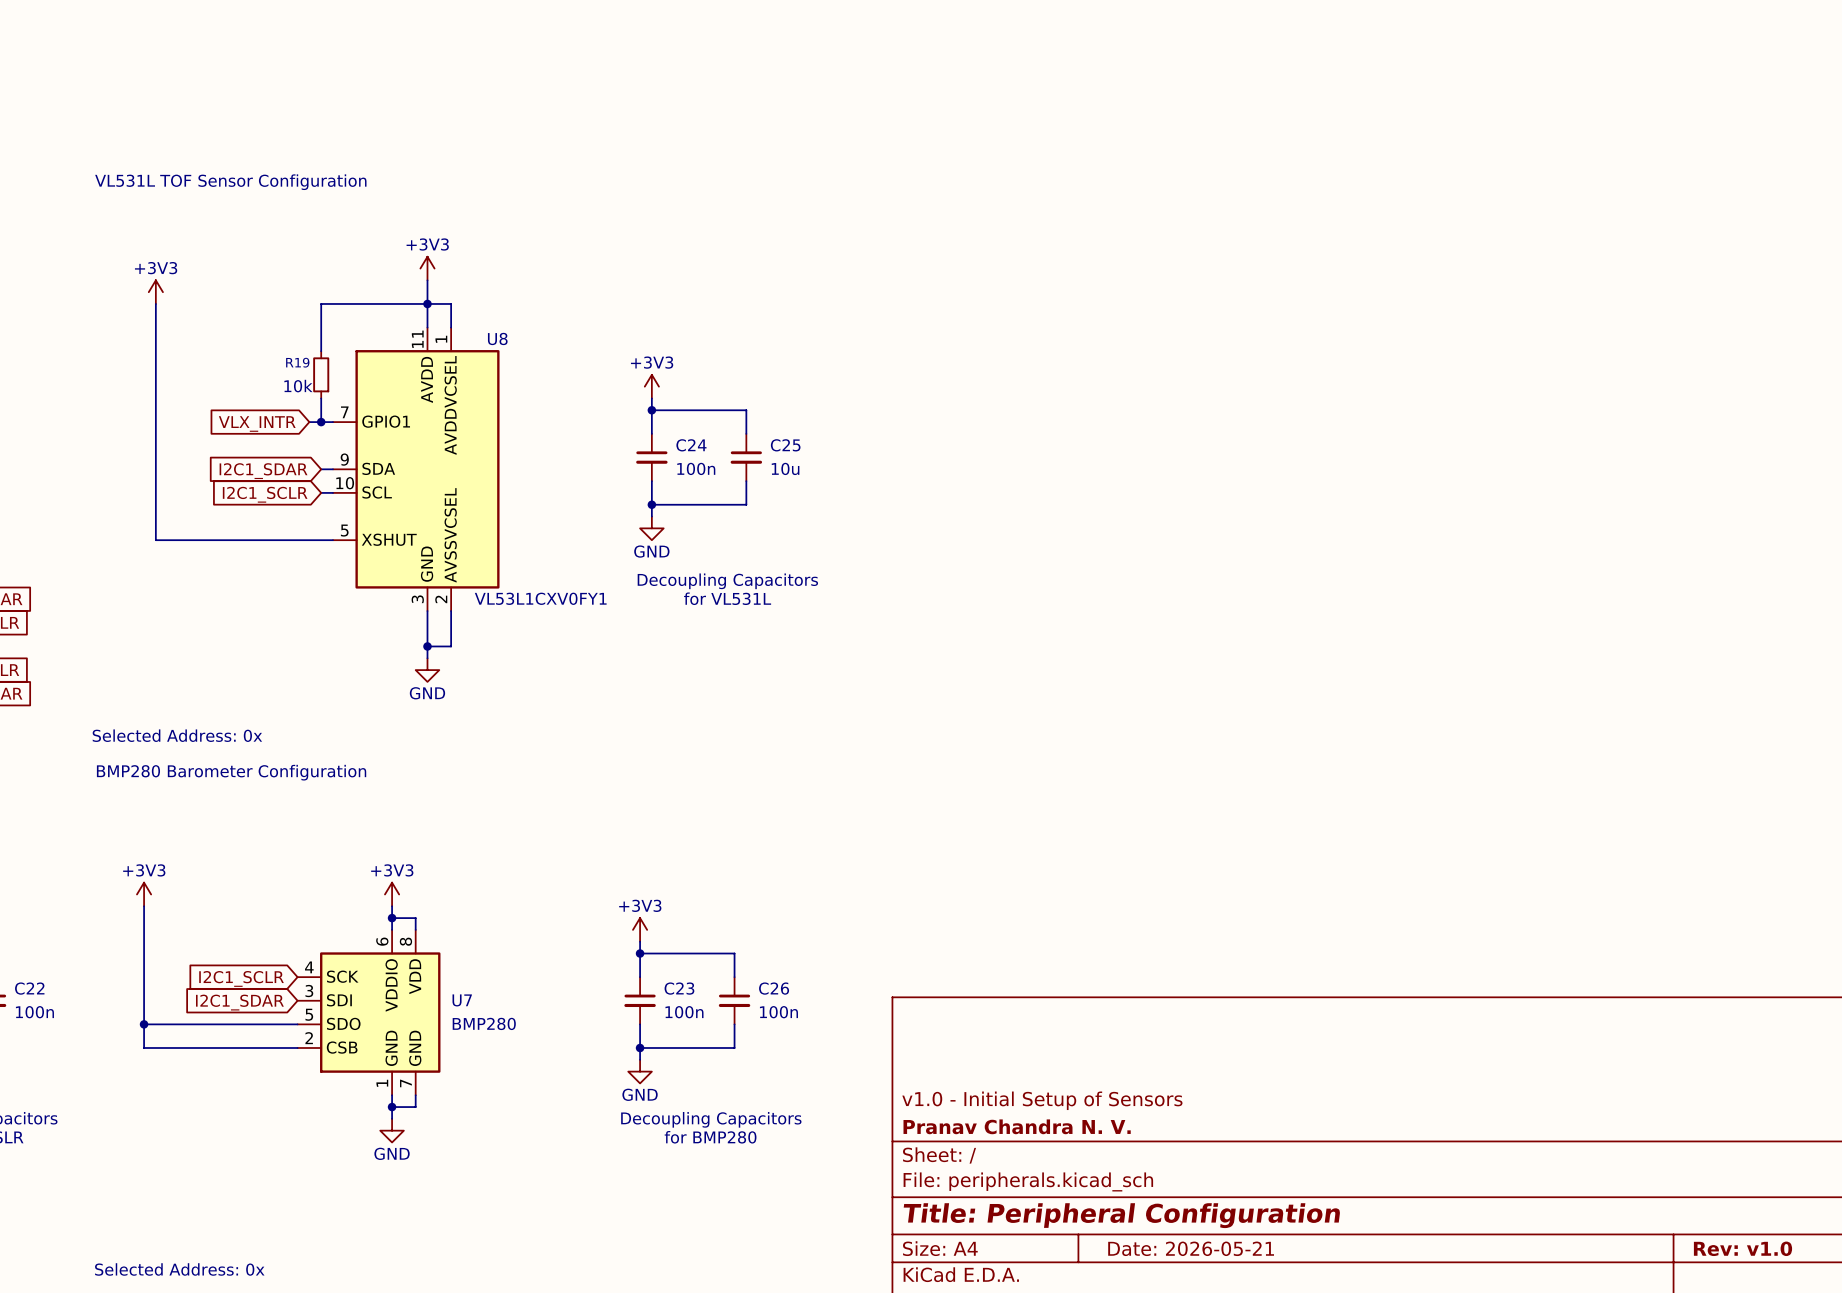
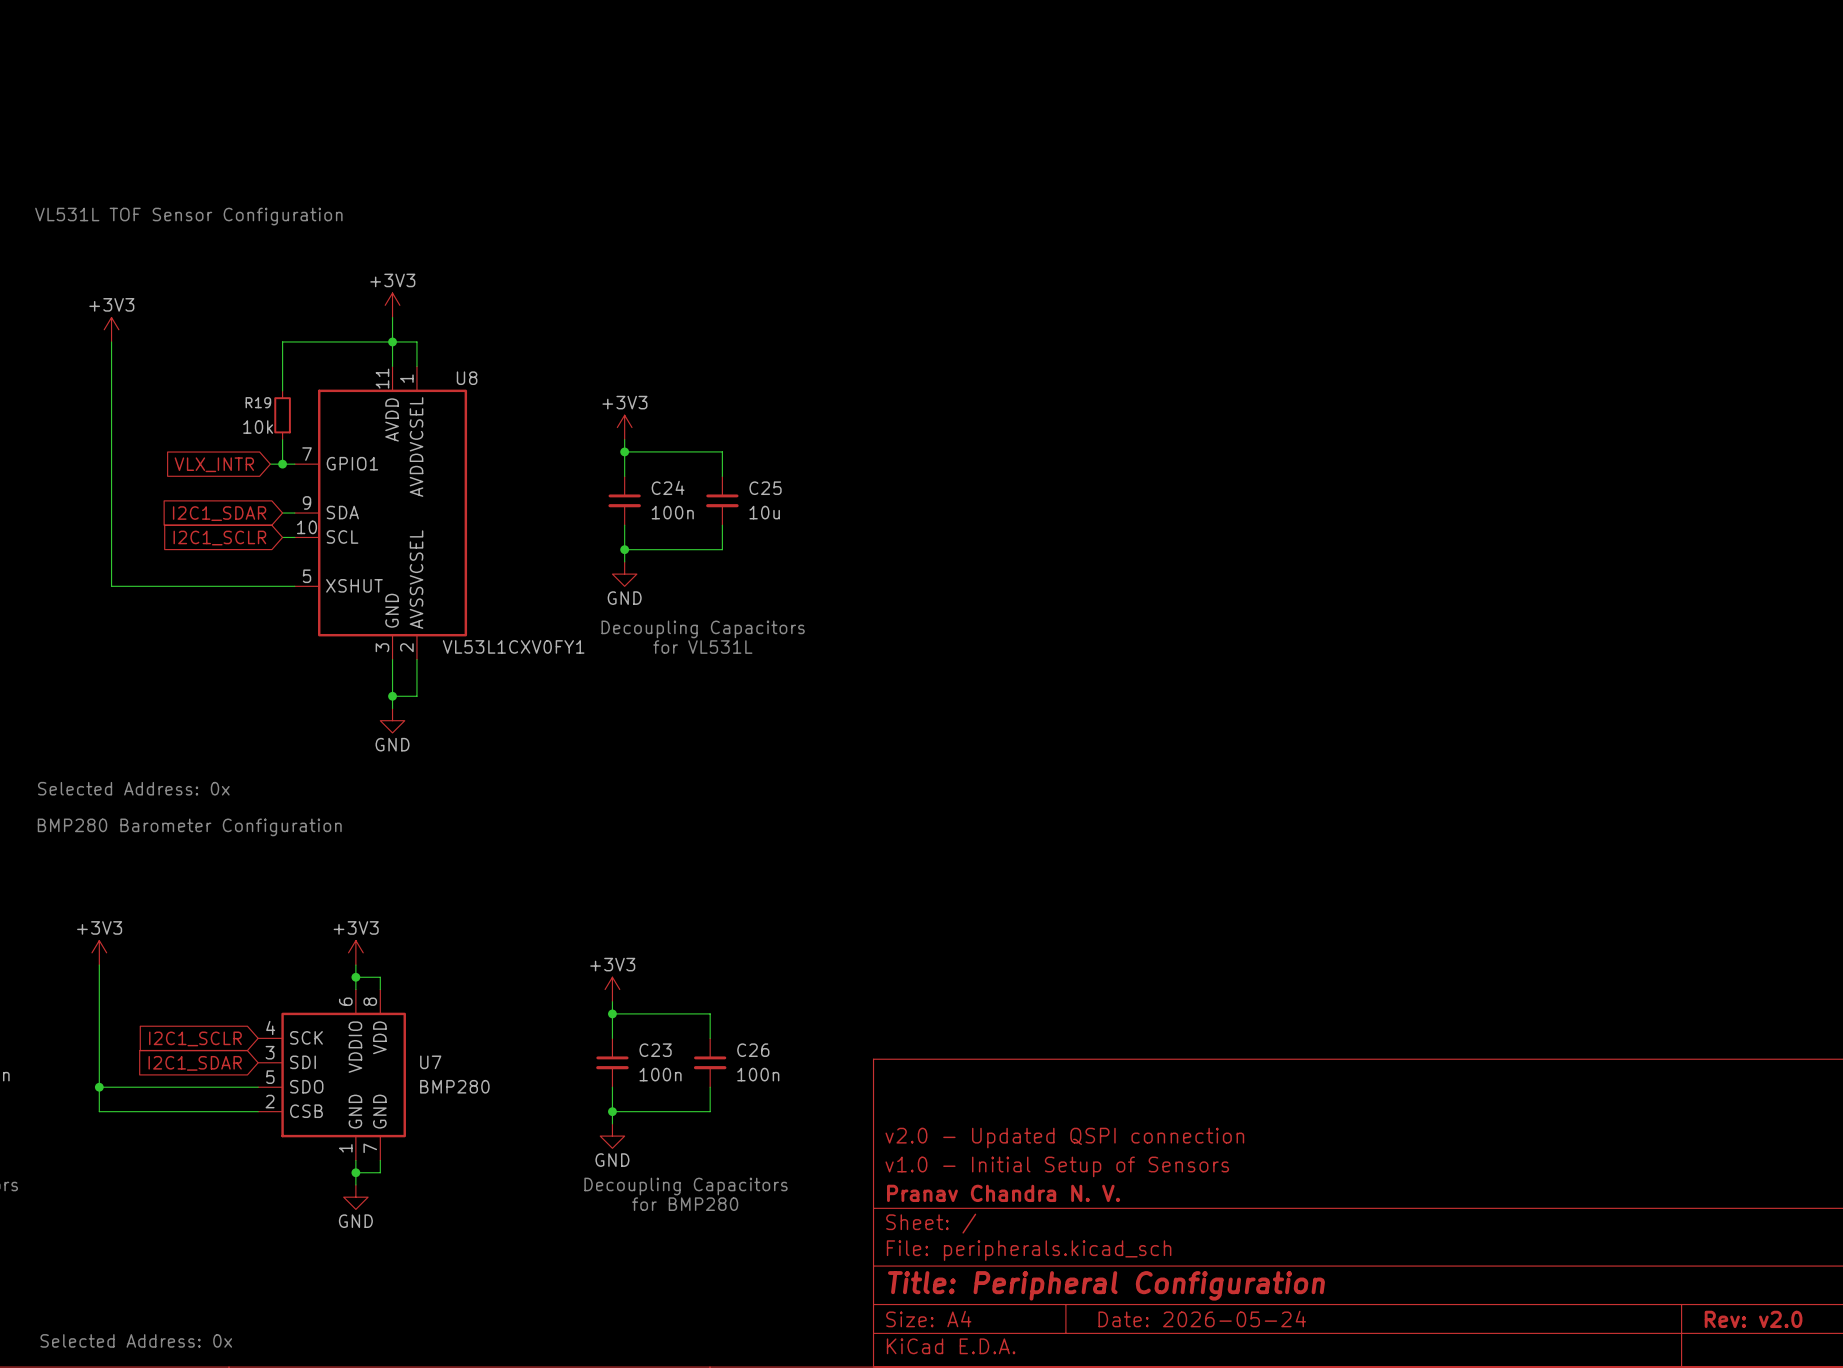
title block: none -> v2.0 - Updated QSPI connection (1064, 1138)
title block: Date: 2026-05-21 (1191, 1248) -> Date: 2026-05-24 (1202, 1319)
title block: Rev: v1.0 (1743, 1248) -> Rev: v2.0 (1753, 1319)

